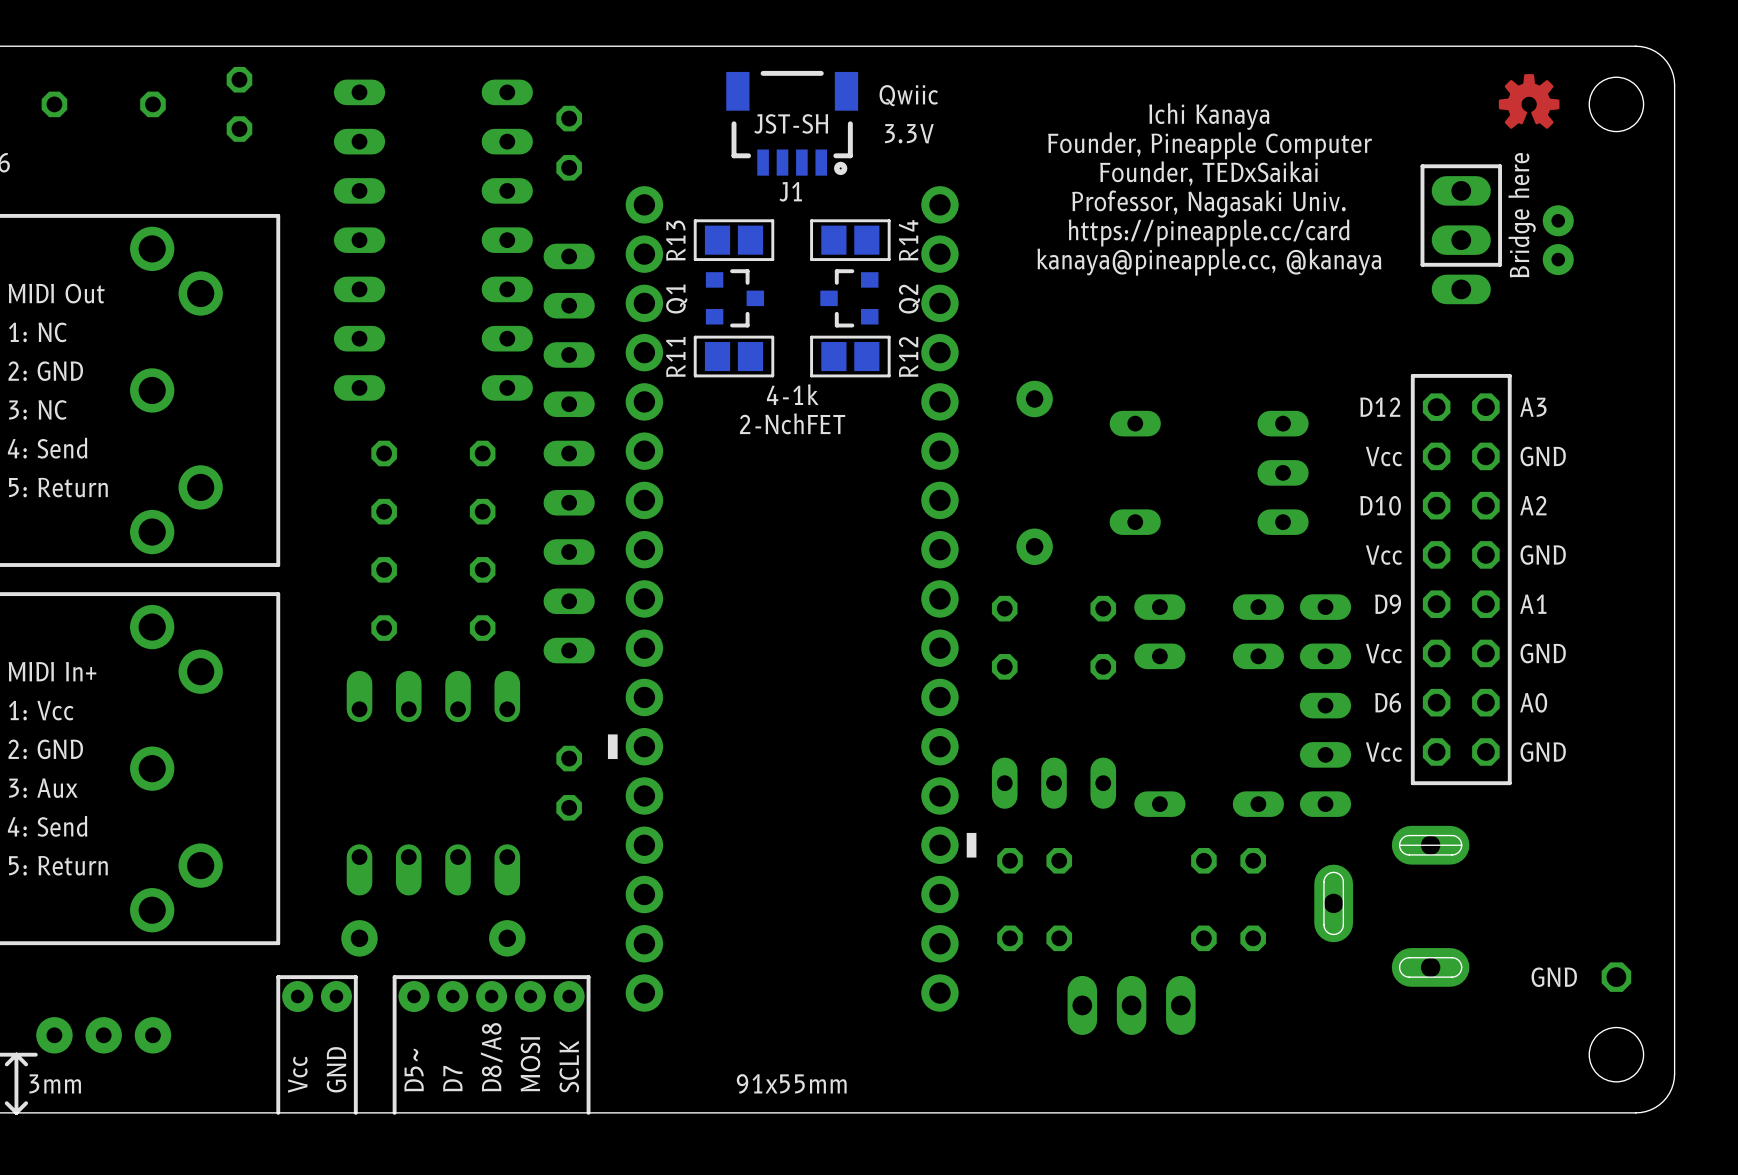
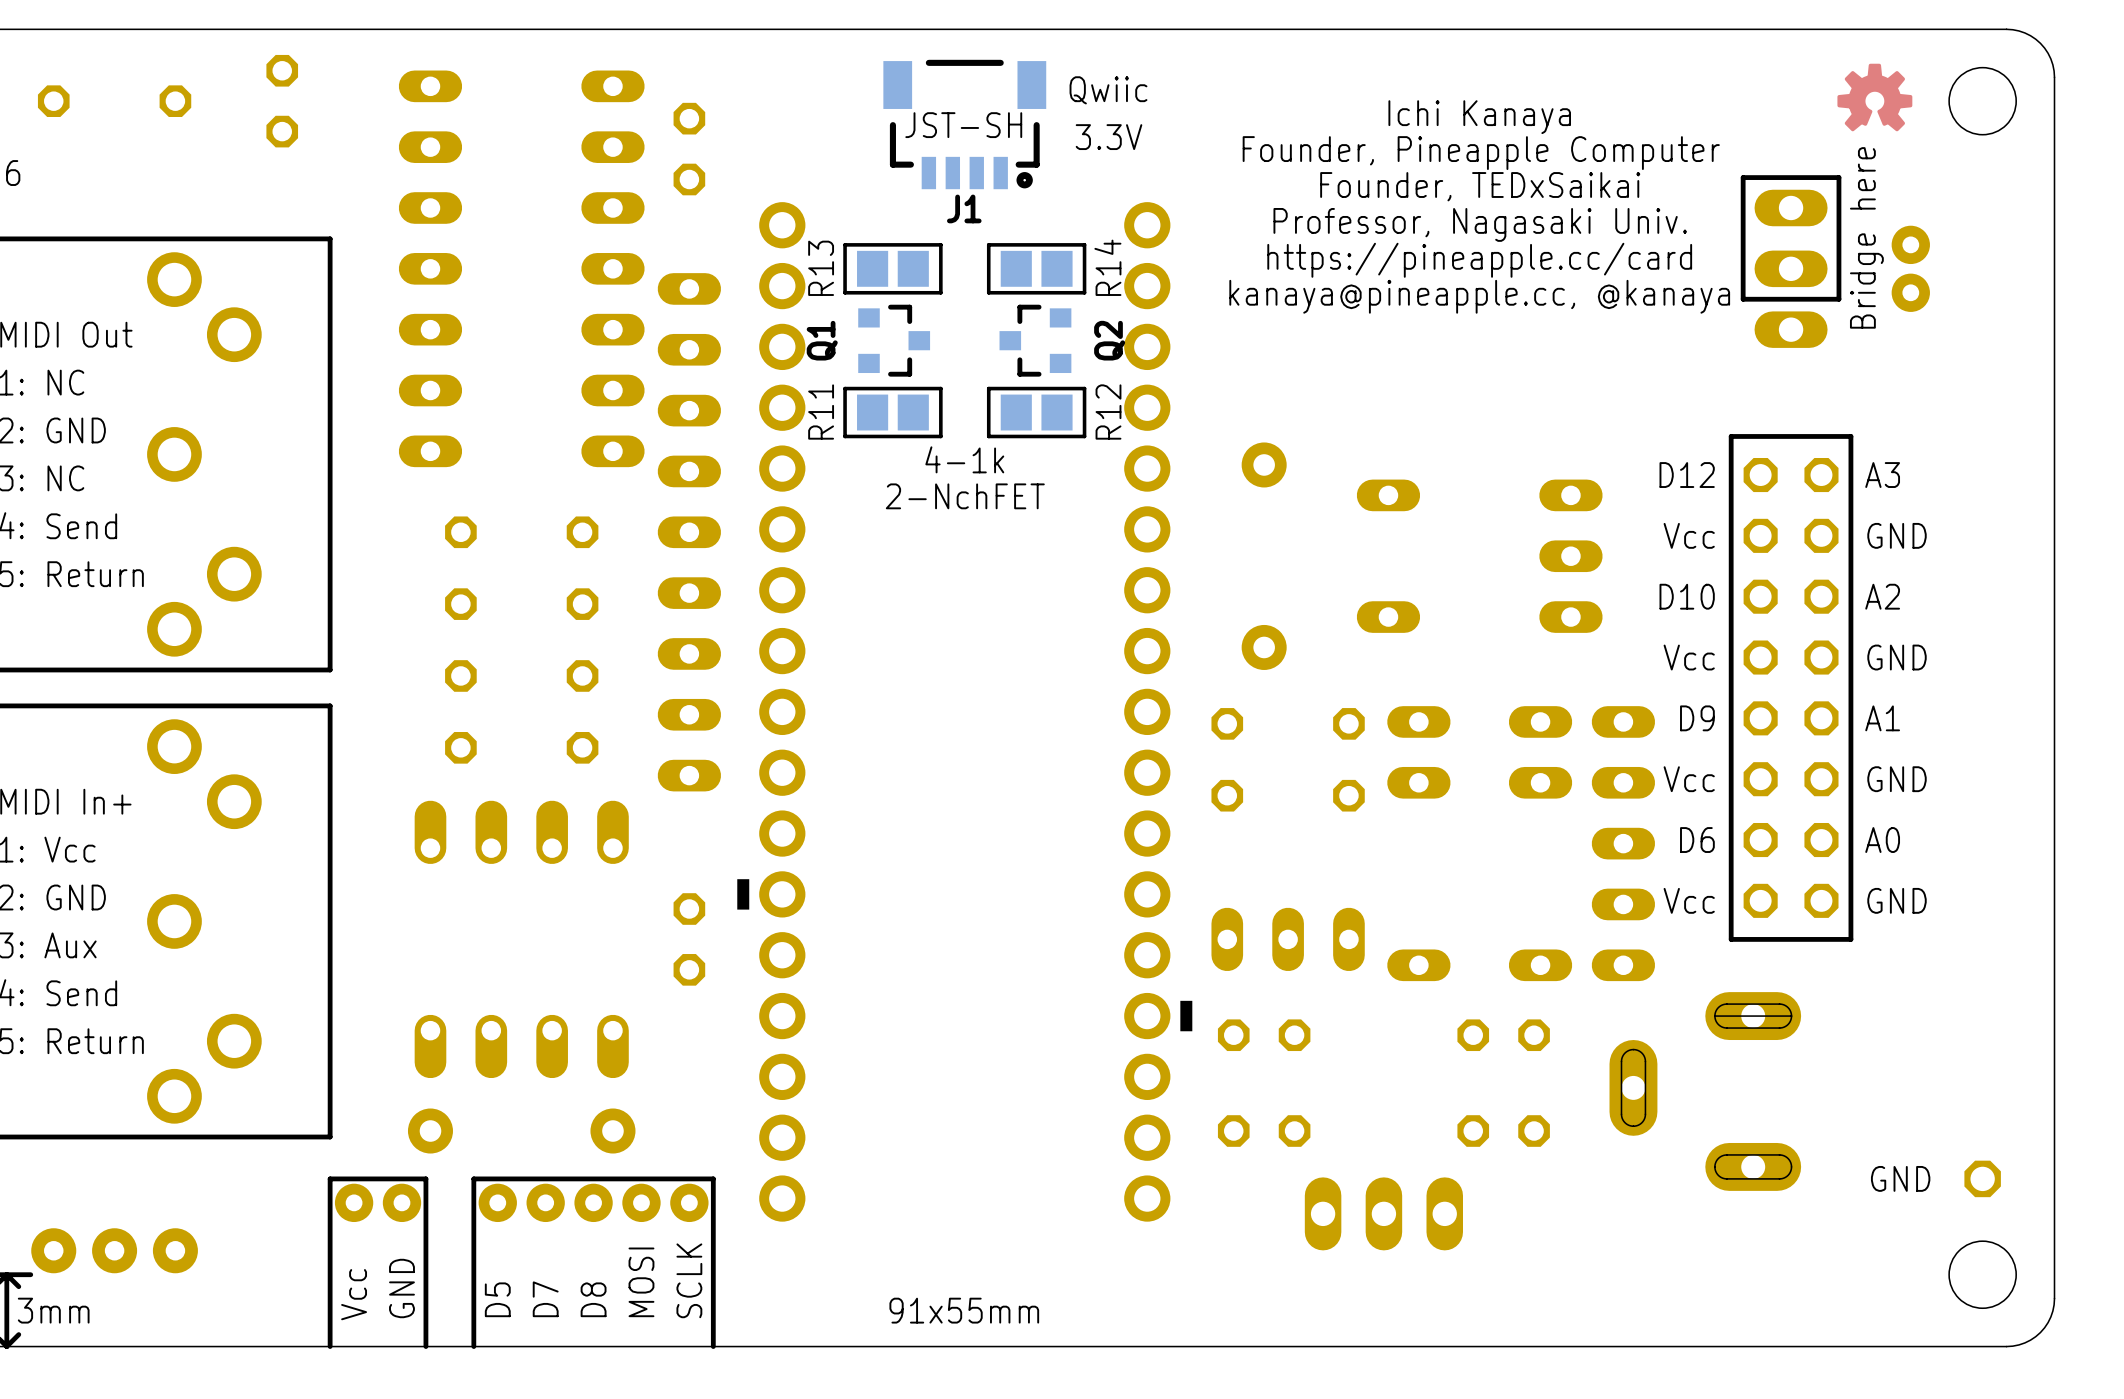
text: D8/A8 (491, 1057) -> D8 (593, 1299)
text: D5~ (414, 1070) -> D5 (497, 1299)

